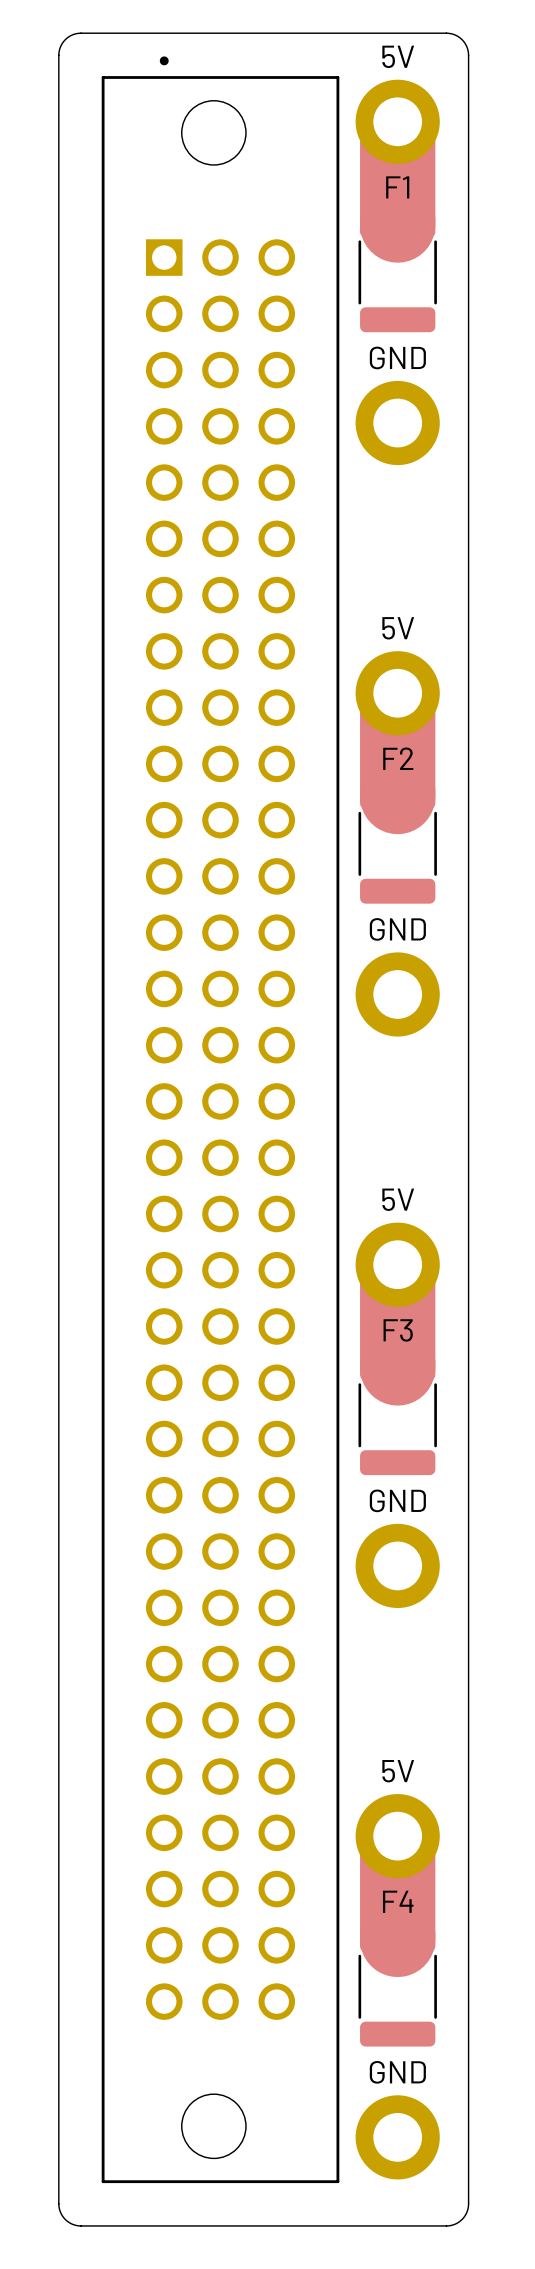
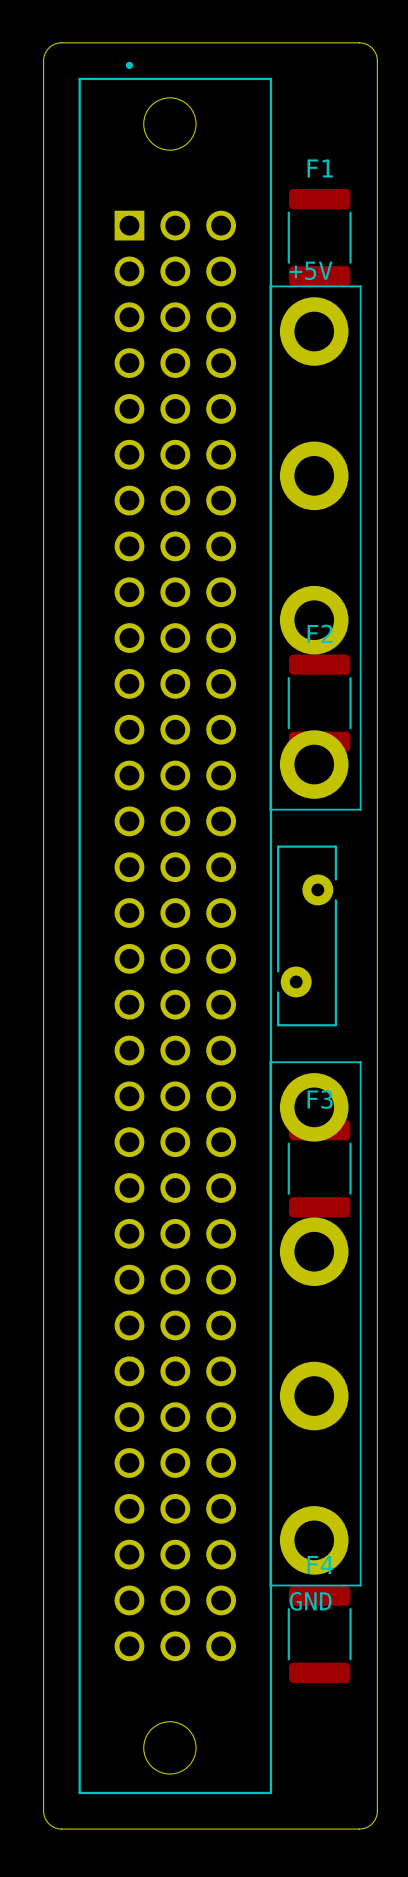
text: 5V (398, 56) -> none
track: (397, 121) (397, 225) -> none
part: (397, 121) -> none
text: none -> +5V (311, 270)
line: none -> (270, 286) (360, 286) (360, 809) (270, 809) (270, 286)
text: GND (397, 357) -> none
part position: (397, 423) -> (314, 331)
part: none -> (314, 475)
text: 5V (398, 628) -> none
track: (397, 693) (397, 796) -> none
part position: (397, 693) -> (314, 620)
text: GND (397, 929) -> none
part position: (397, 994) -> (314, 764)
part: none -> (307, 935)
text: 5V (398, 1199) -> none
track: (397, 1264) (397, 1367) -> none
part position: (397, 1264) -> (314, 1107)
line: none -> (270, 1062) (270, 1585) (360, 1585) (360, 1062) (270, 1062)
text: GND (397, 1500) -> none
part position: (397, 1565) -> (314, 1251)
part: none -> (314, 1396)
text: 5V (398, 1771) -> none
track: (397, 1836) (397, 1939) -> none
part position: (397, 1836) -> (314, 1540)
text position: GND (397, 2072) -> GND (310, 1601)
part: (397, 2137) -> none

